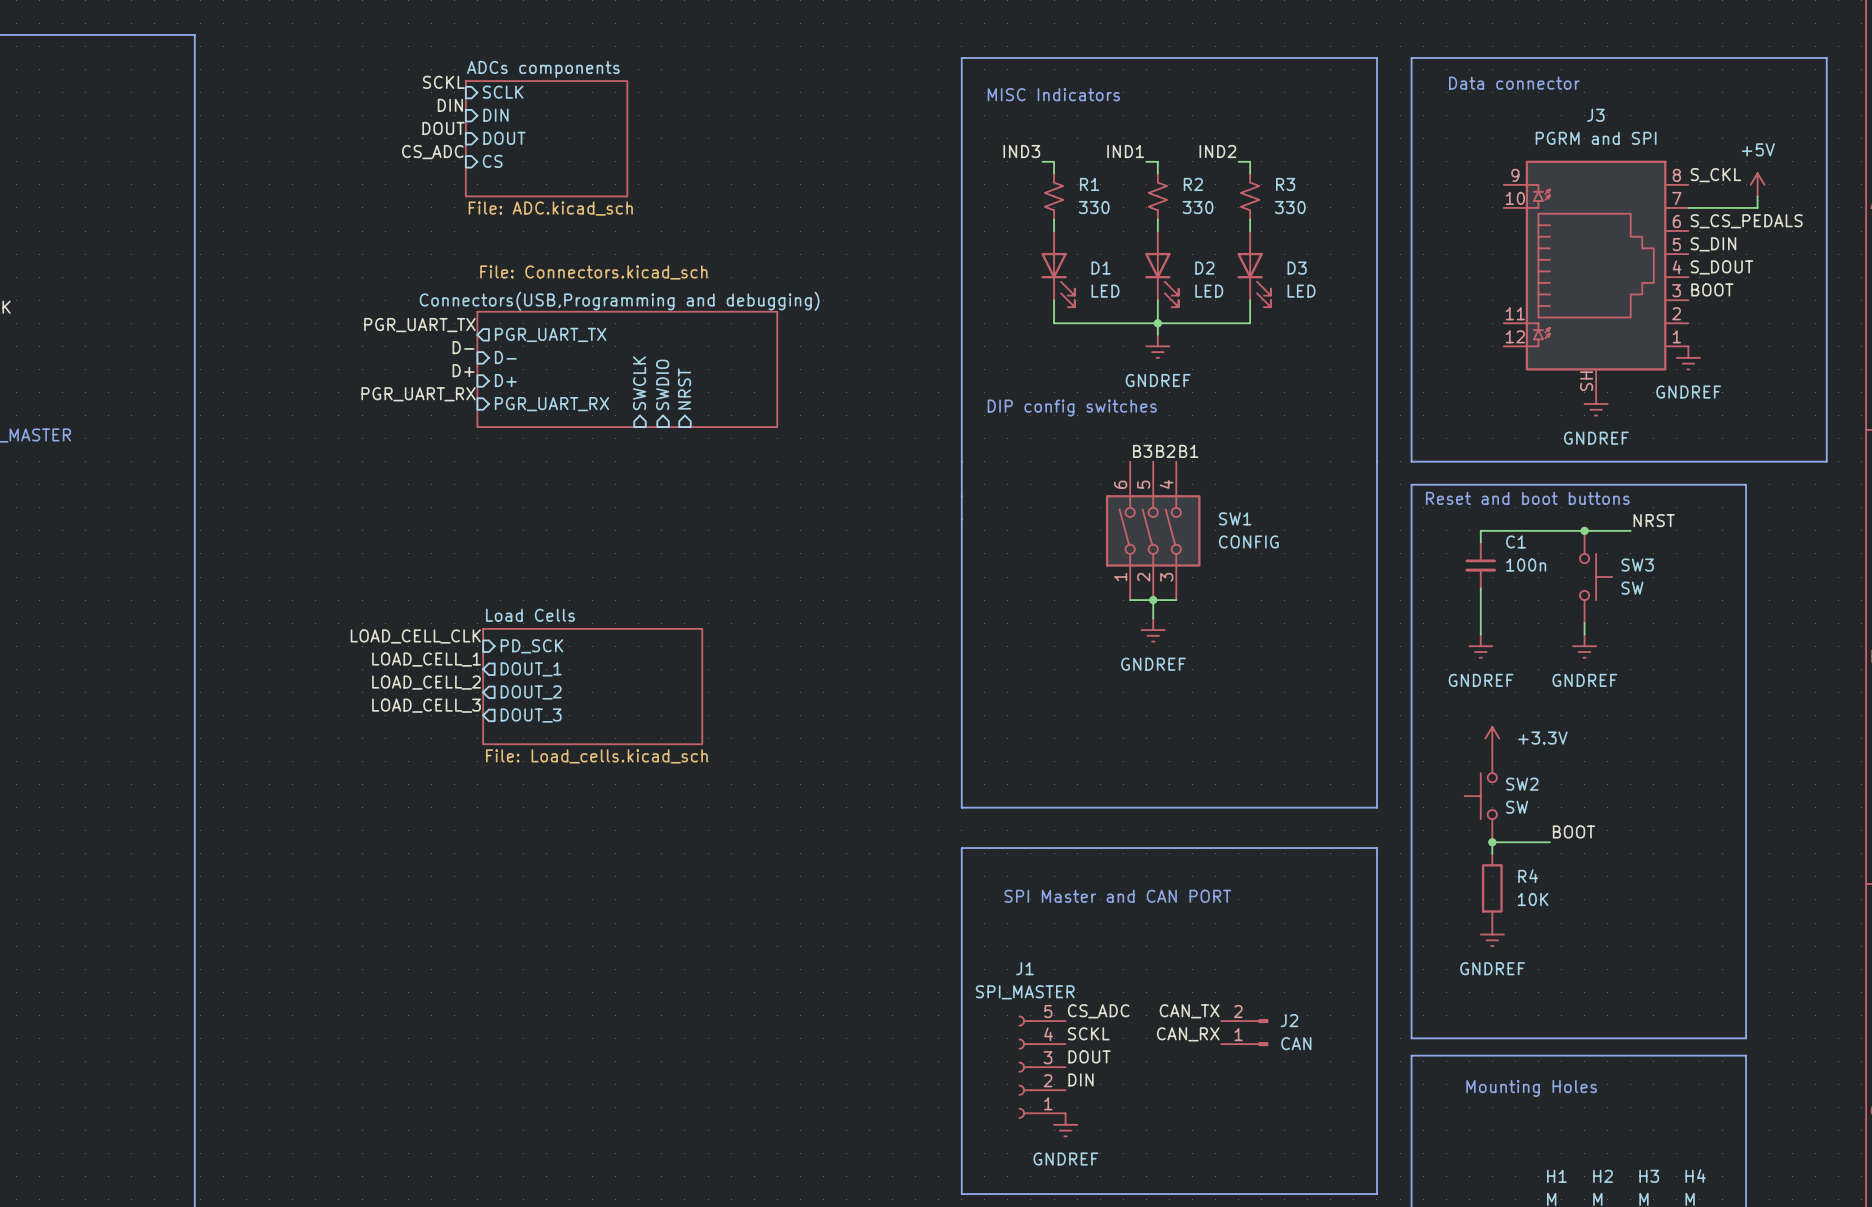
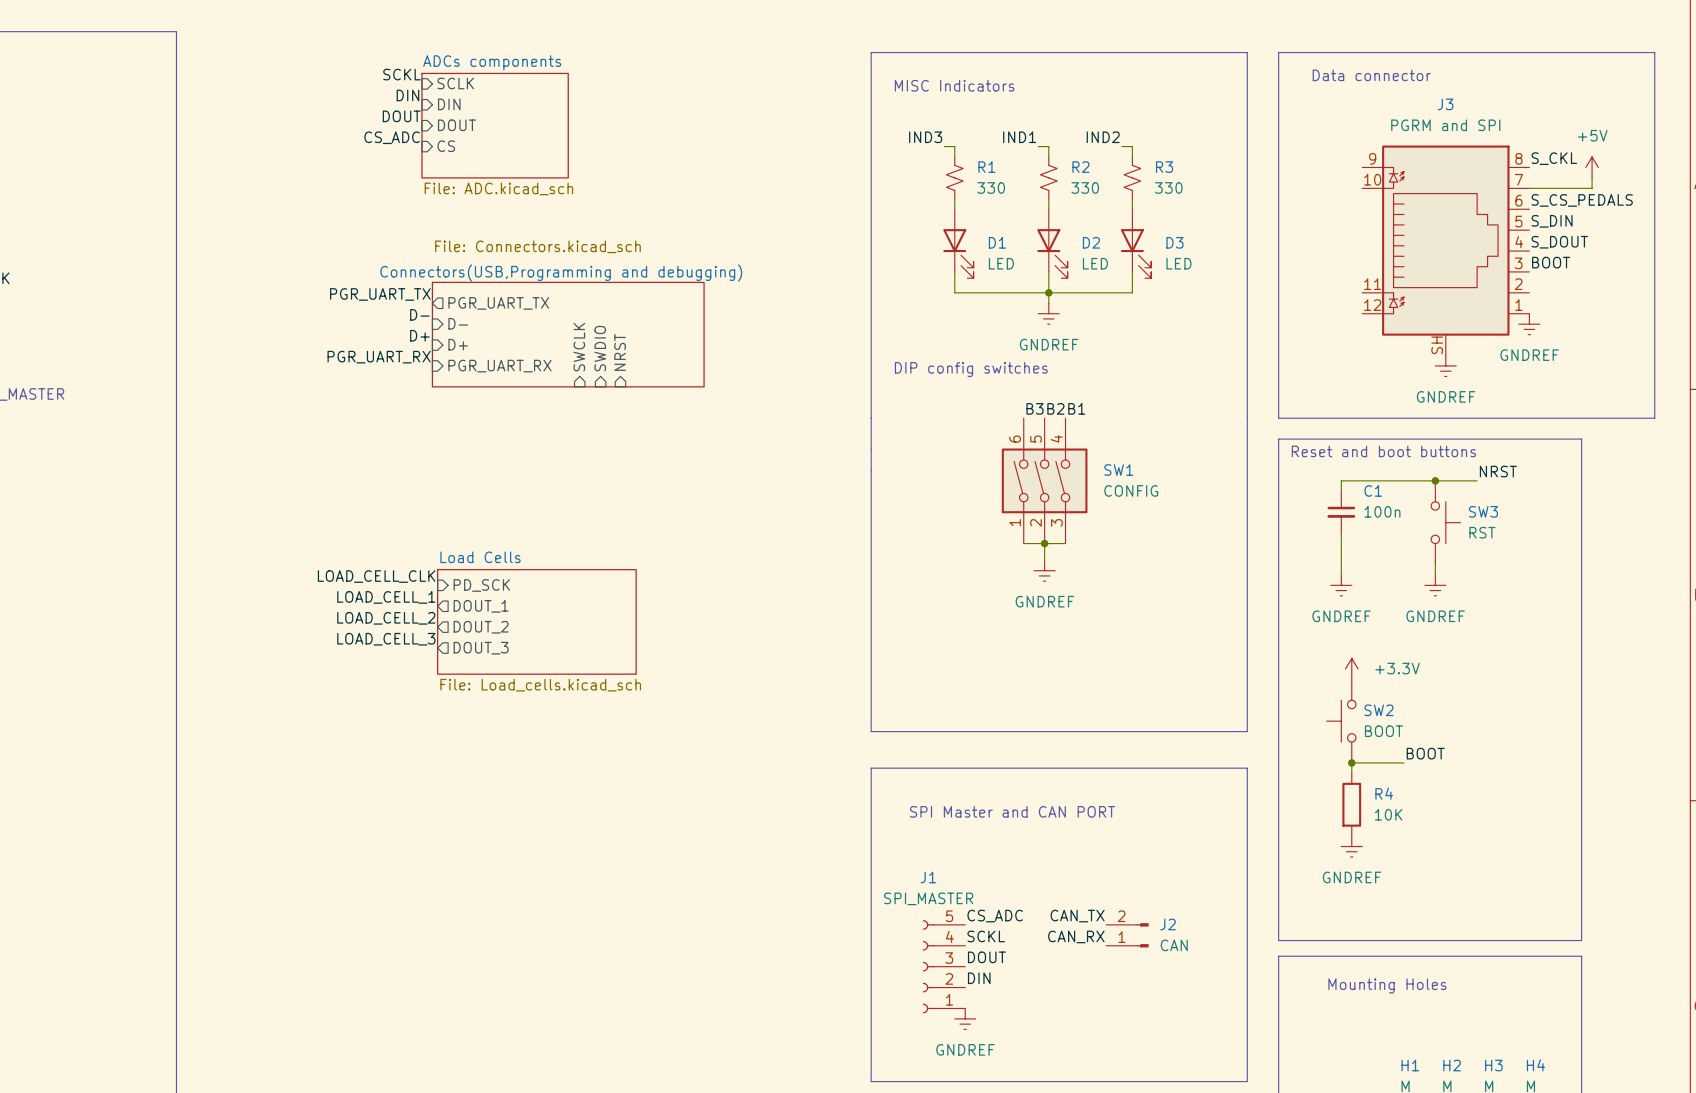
SW3 value: SW (1632, 588) -> RST (1482, 532)
SW2 value: SW (1517, 807) -> BOOT (1383, 731)

